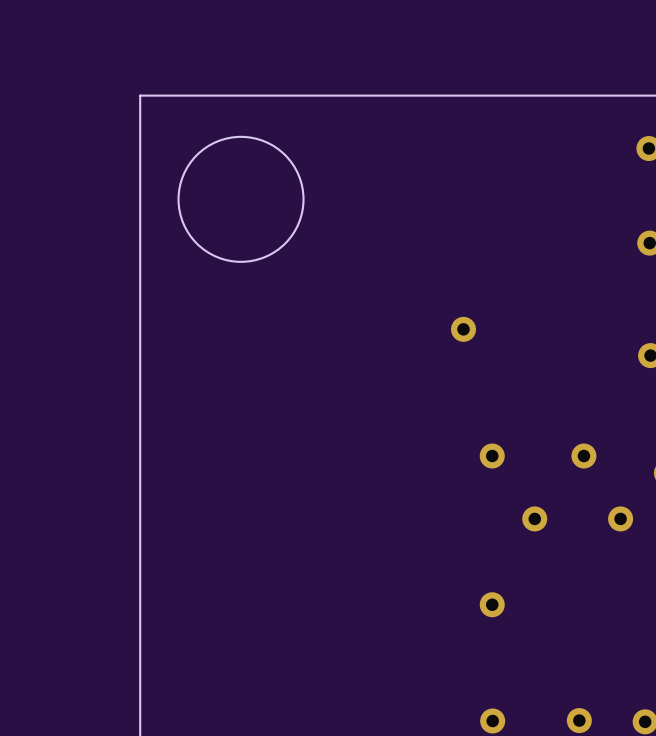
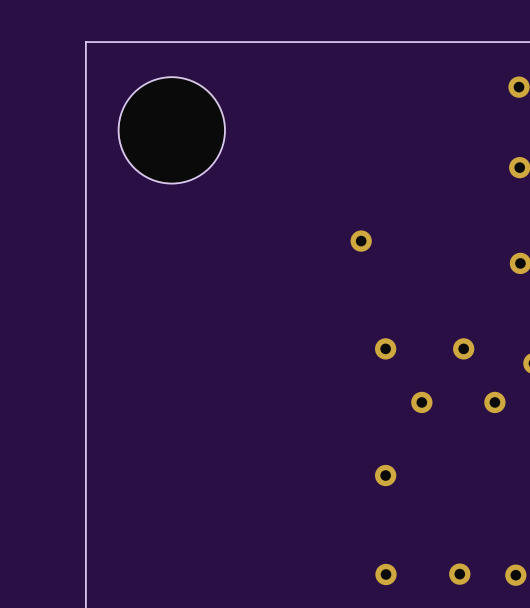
part: none -> (172, 129)

